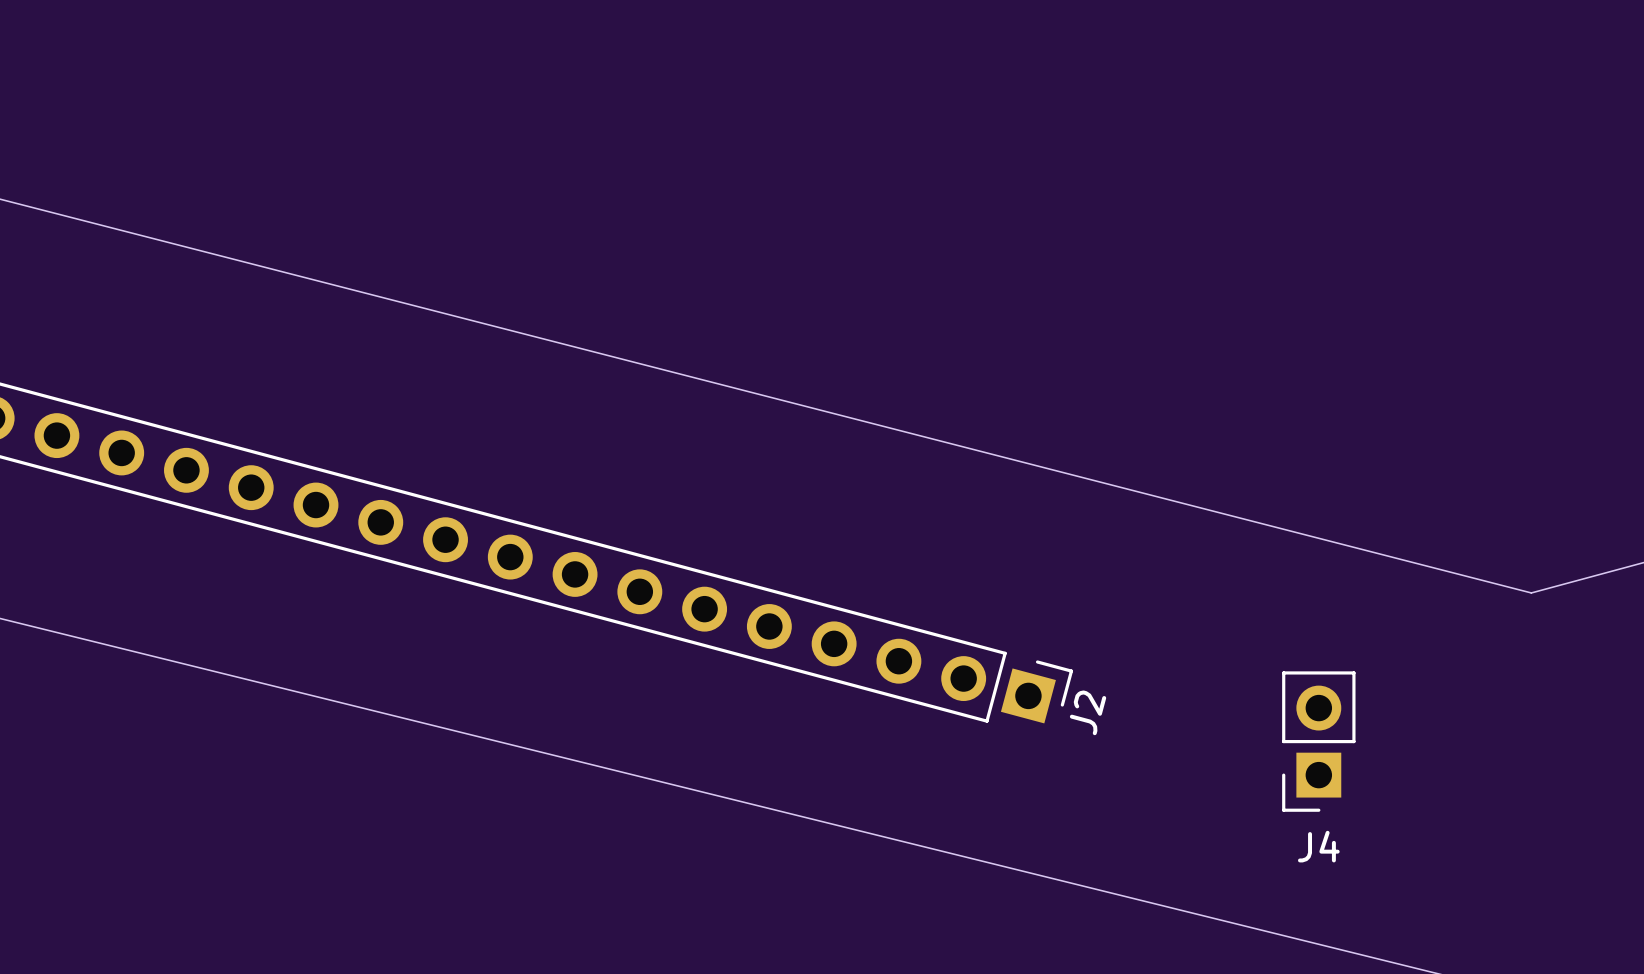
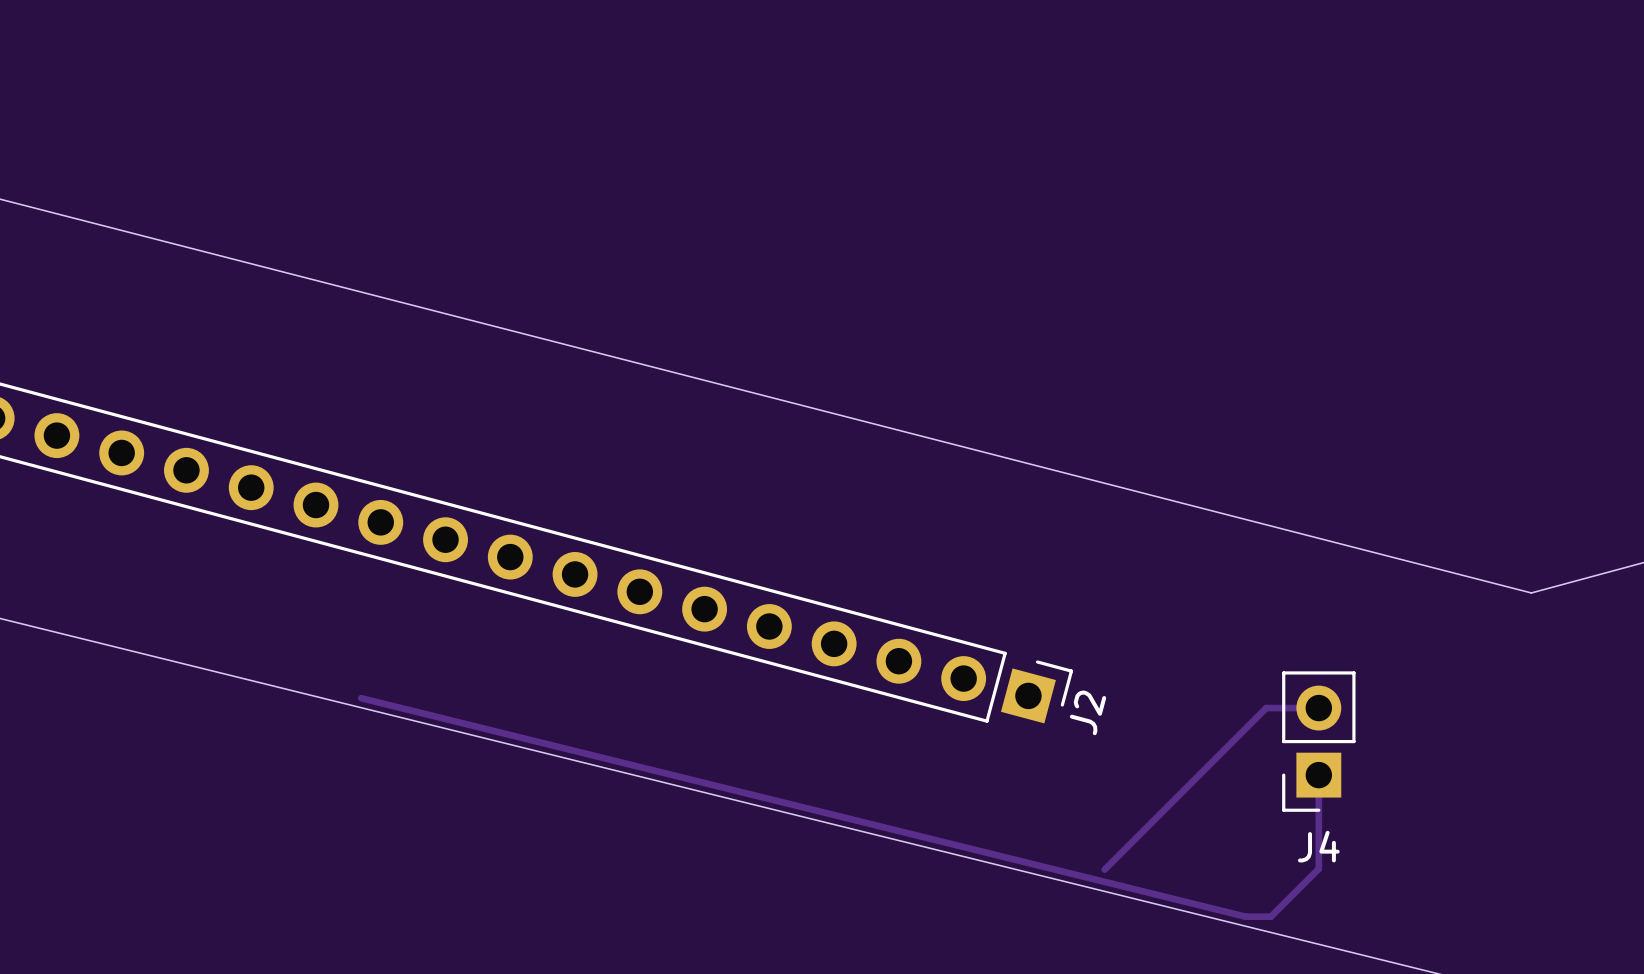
track: none -> (361, 698) (1245, 916) (1270, 916) (1318, 868) (1318, 775)
track: none -> (1318, 708) (1266, 708) (1104, 869)

